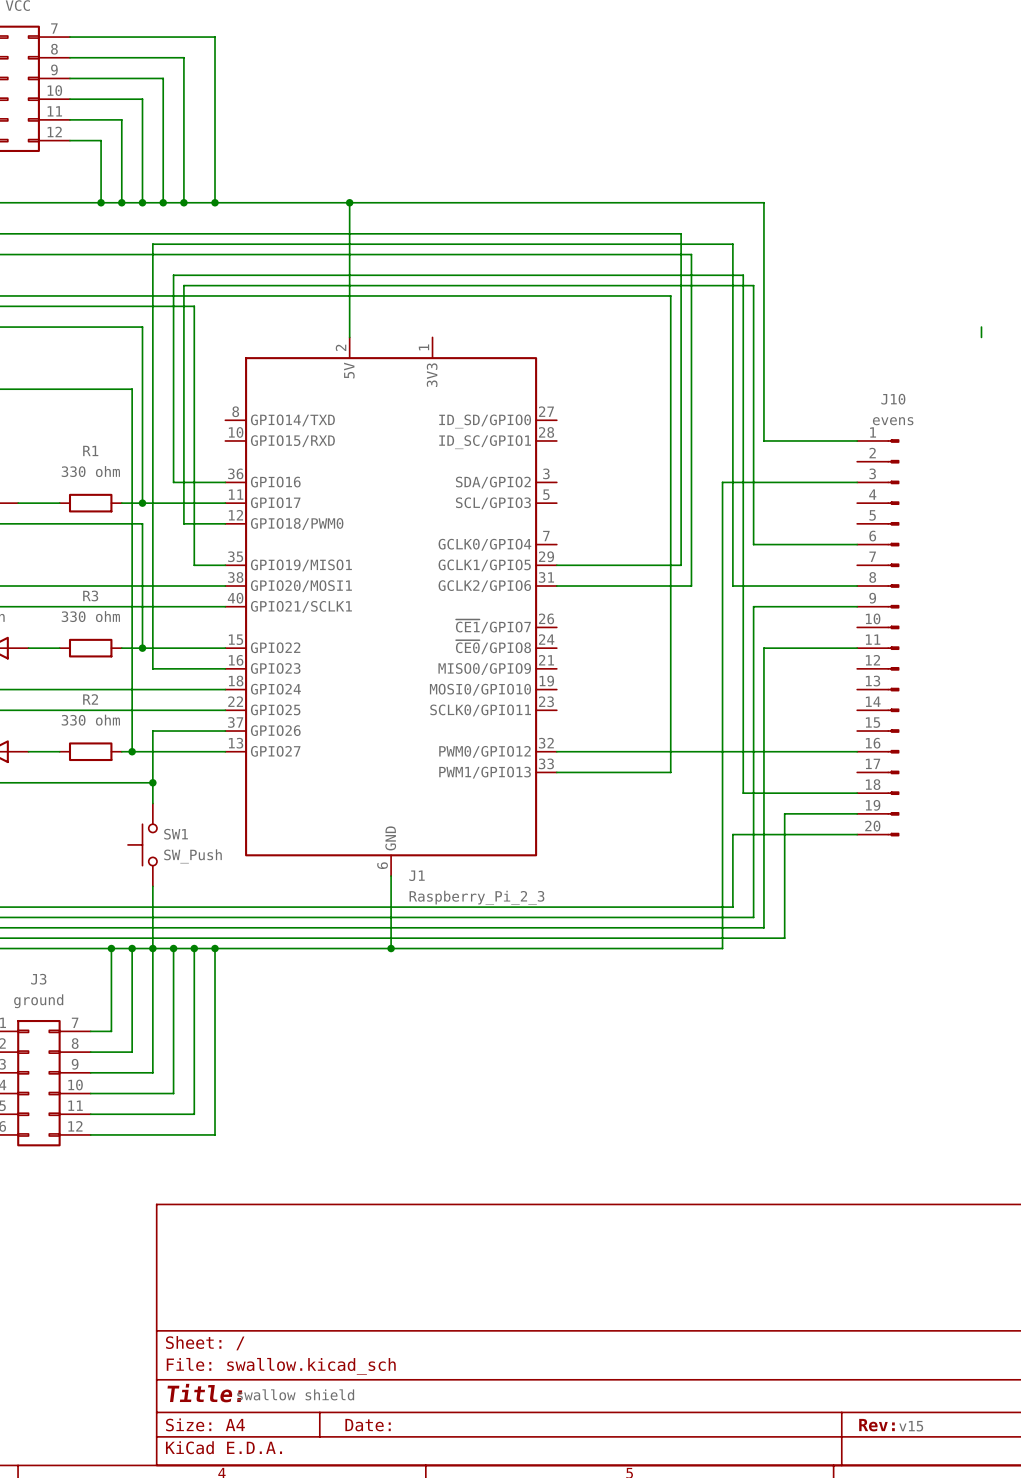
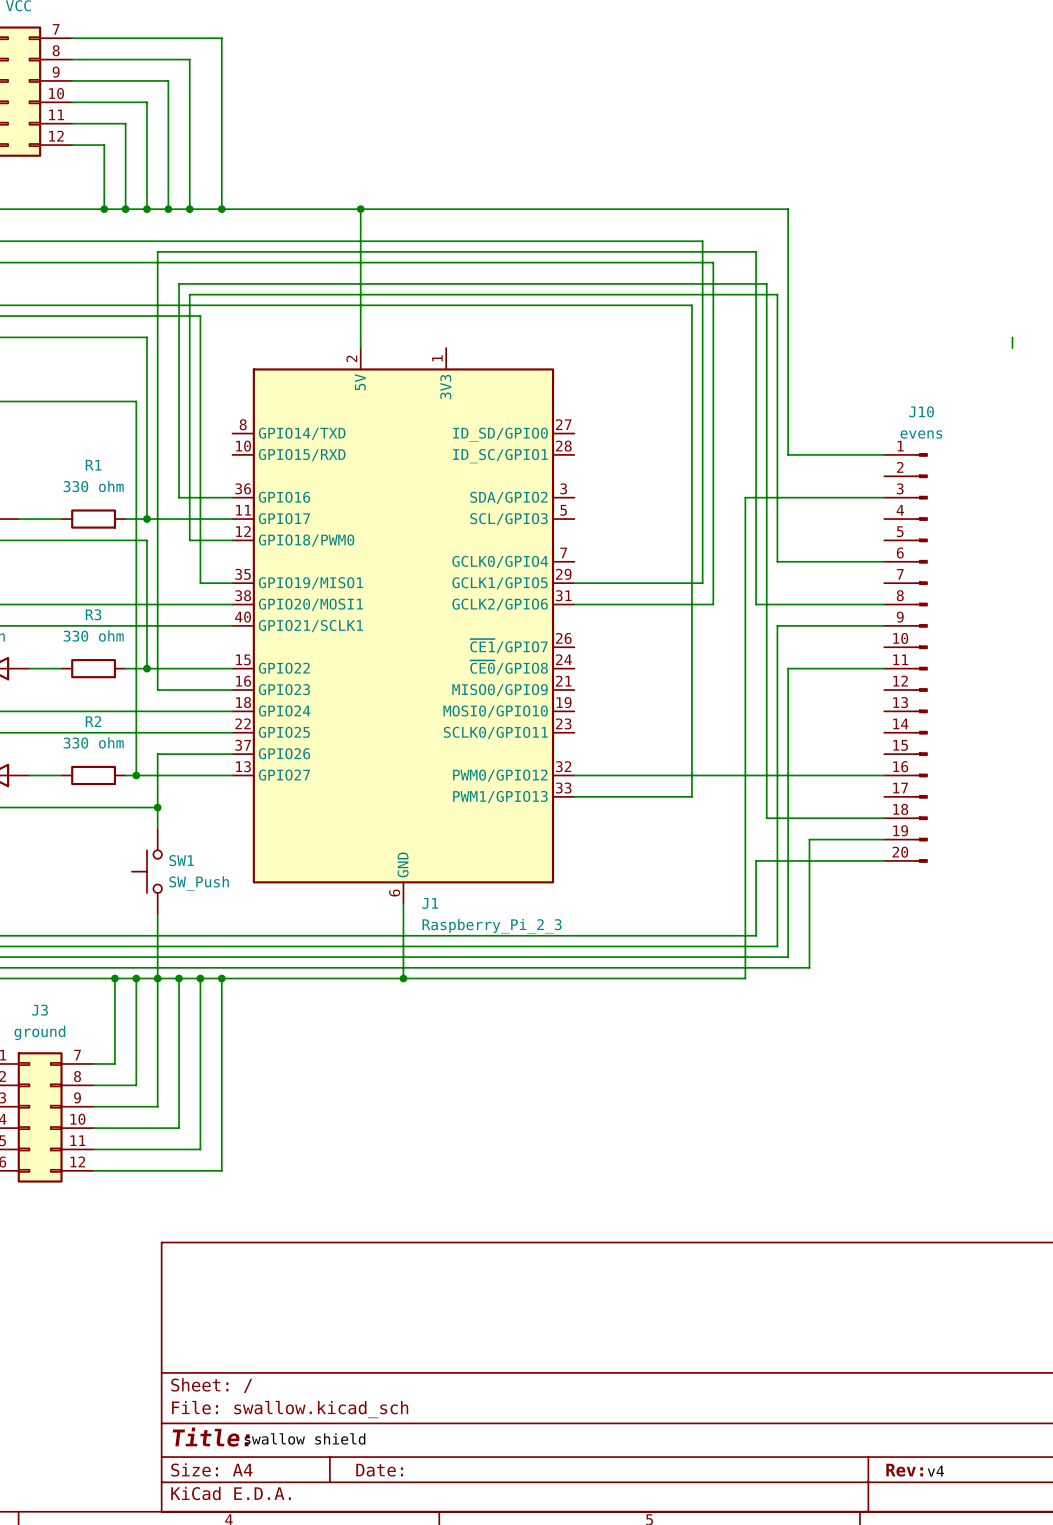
label: v15 (911, 1426) -> v4 (935, 1471)

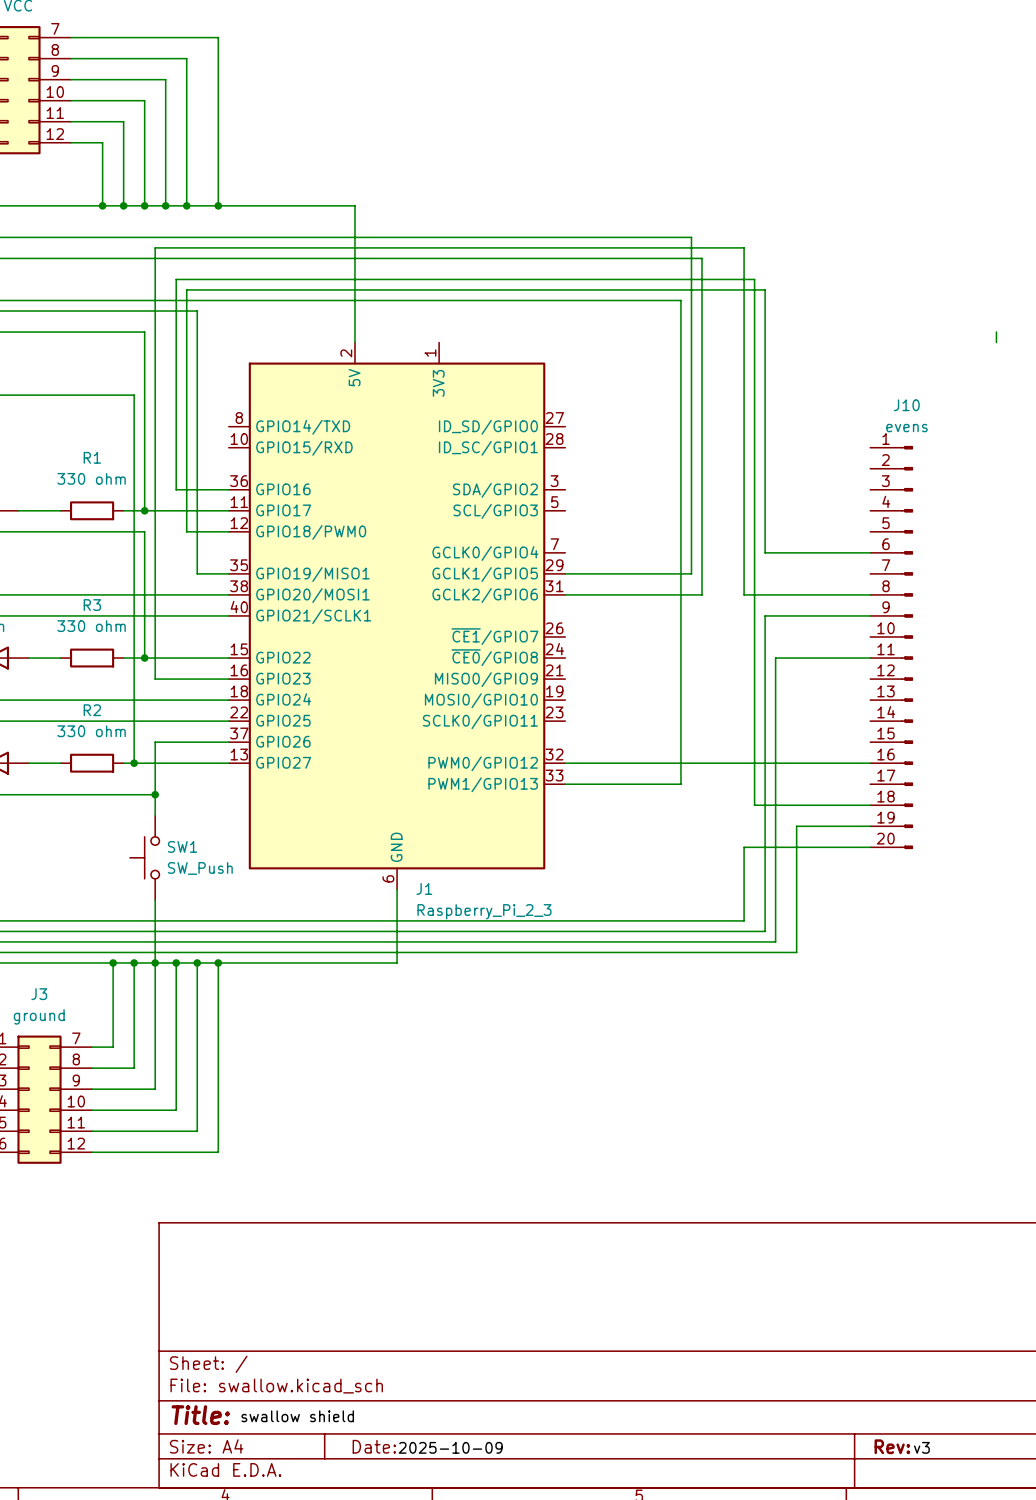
wire: (360, 209) (788, 209) (788, 454) (884, 454) -> none
junction: (360, 209) -> none
wire: (884, 497) (745, 497) (745, 978) (403, 978) -> none
junction: (403, 978) -> none
label: none -> 2025-10-09 (450, 1447)
label: v4 (935, 1471) -> v3 (921, 1447)

